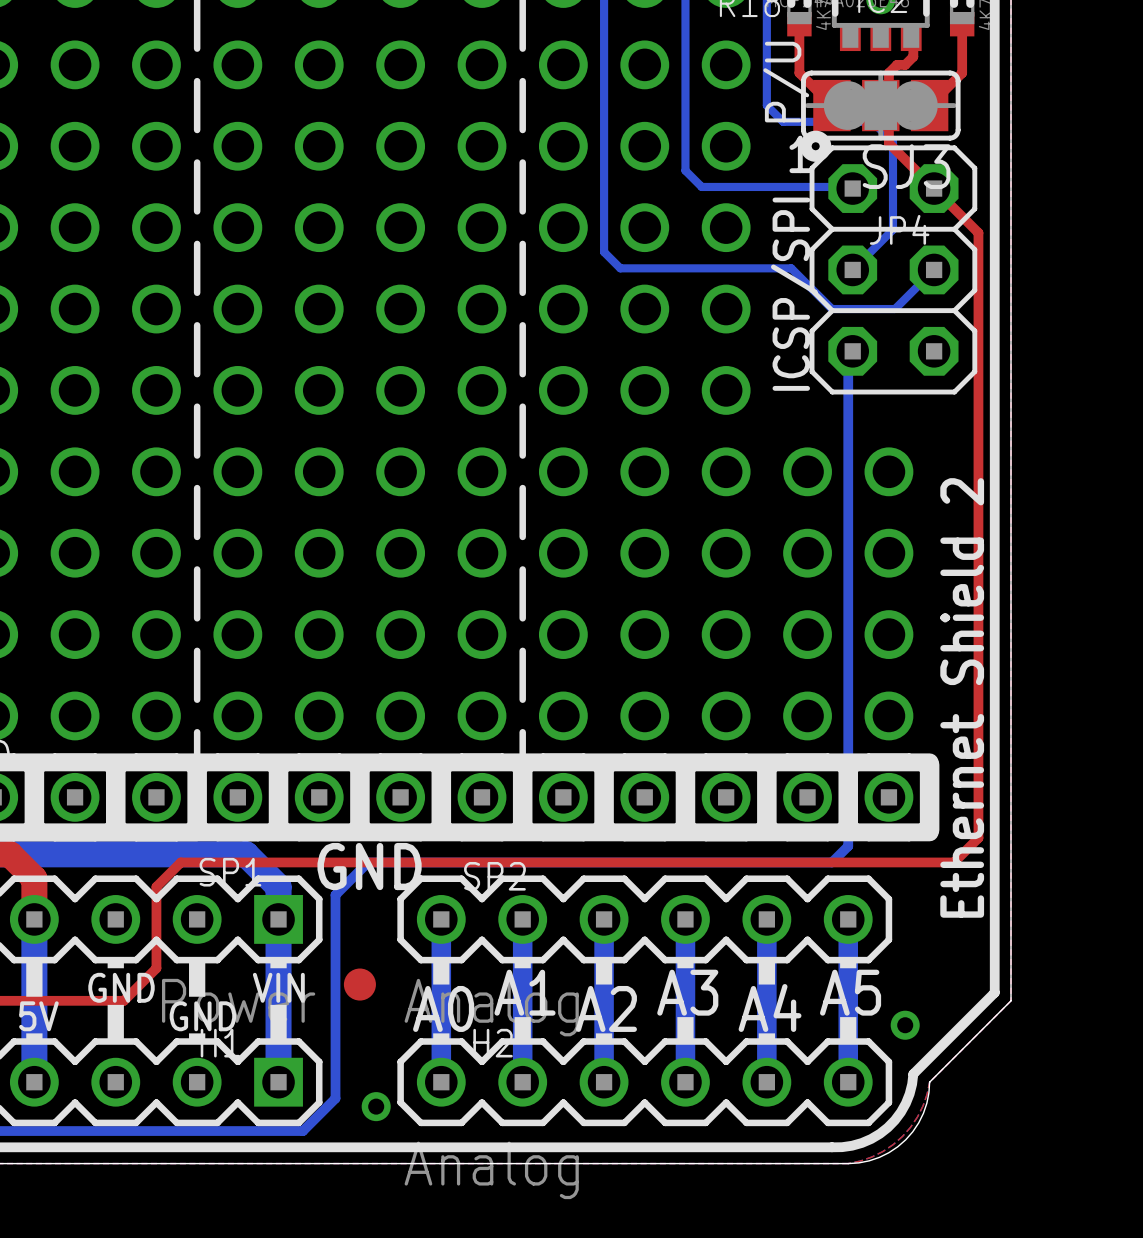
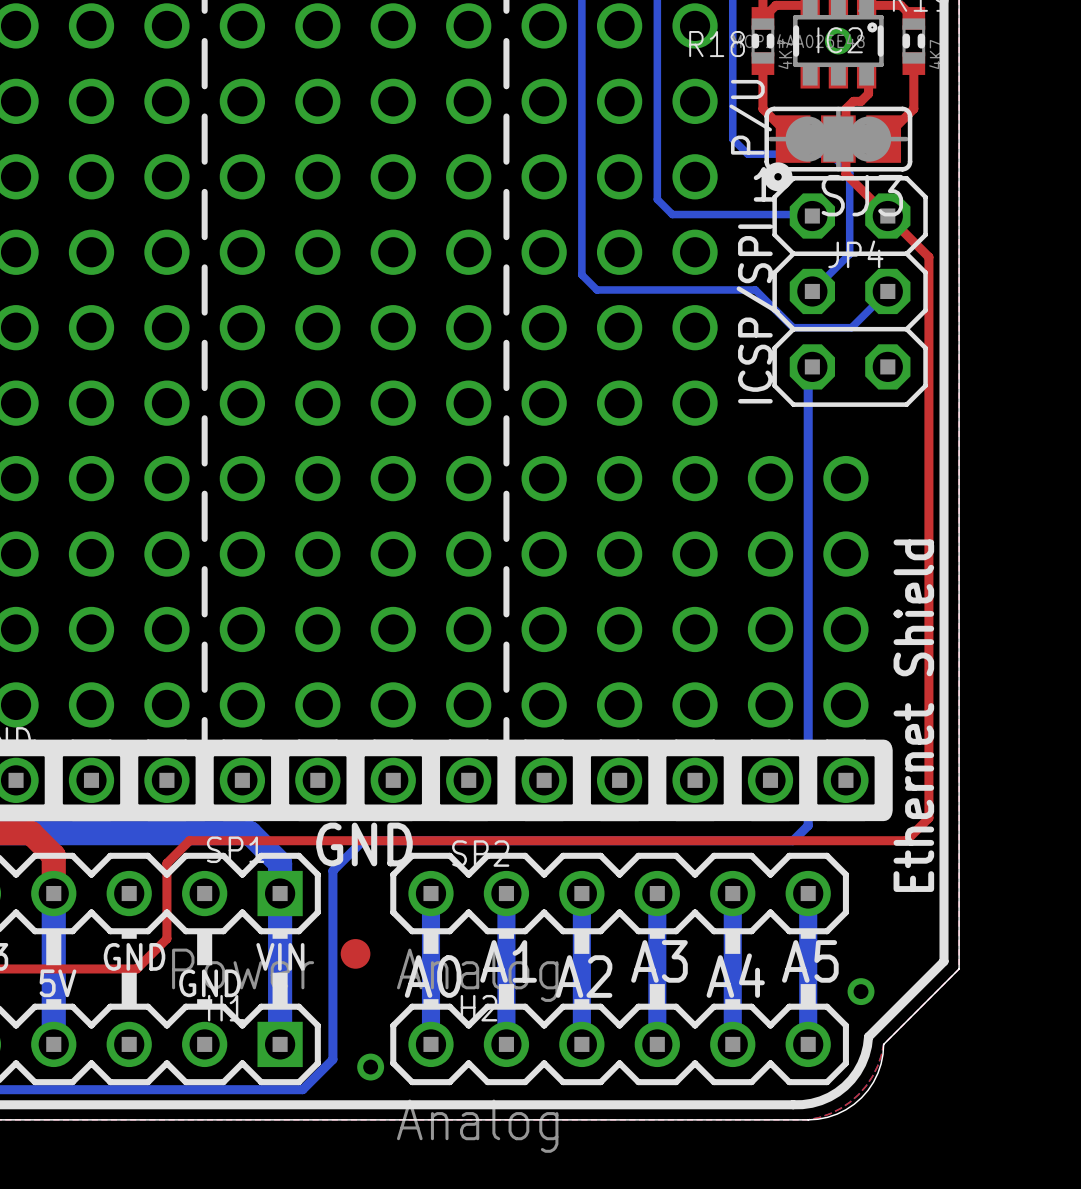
text: Ethernet Shield 2 (962, 697) -> Ethernet Shield (913, 715)

